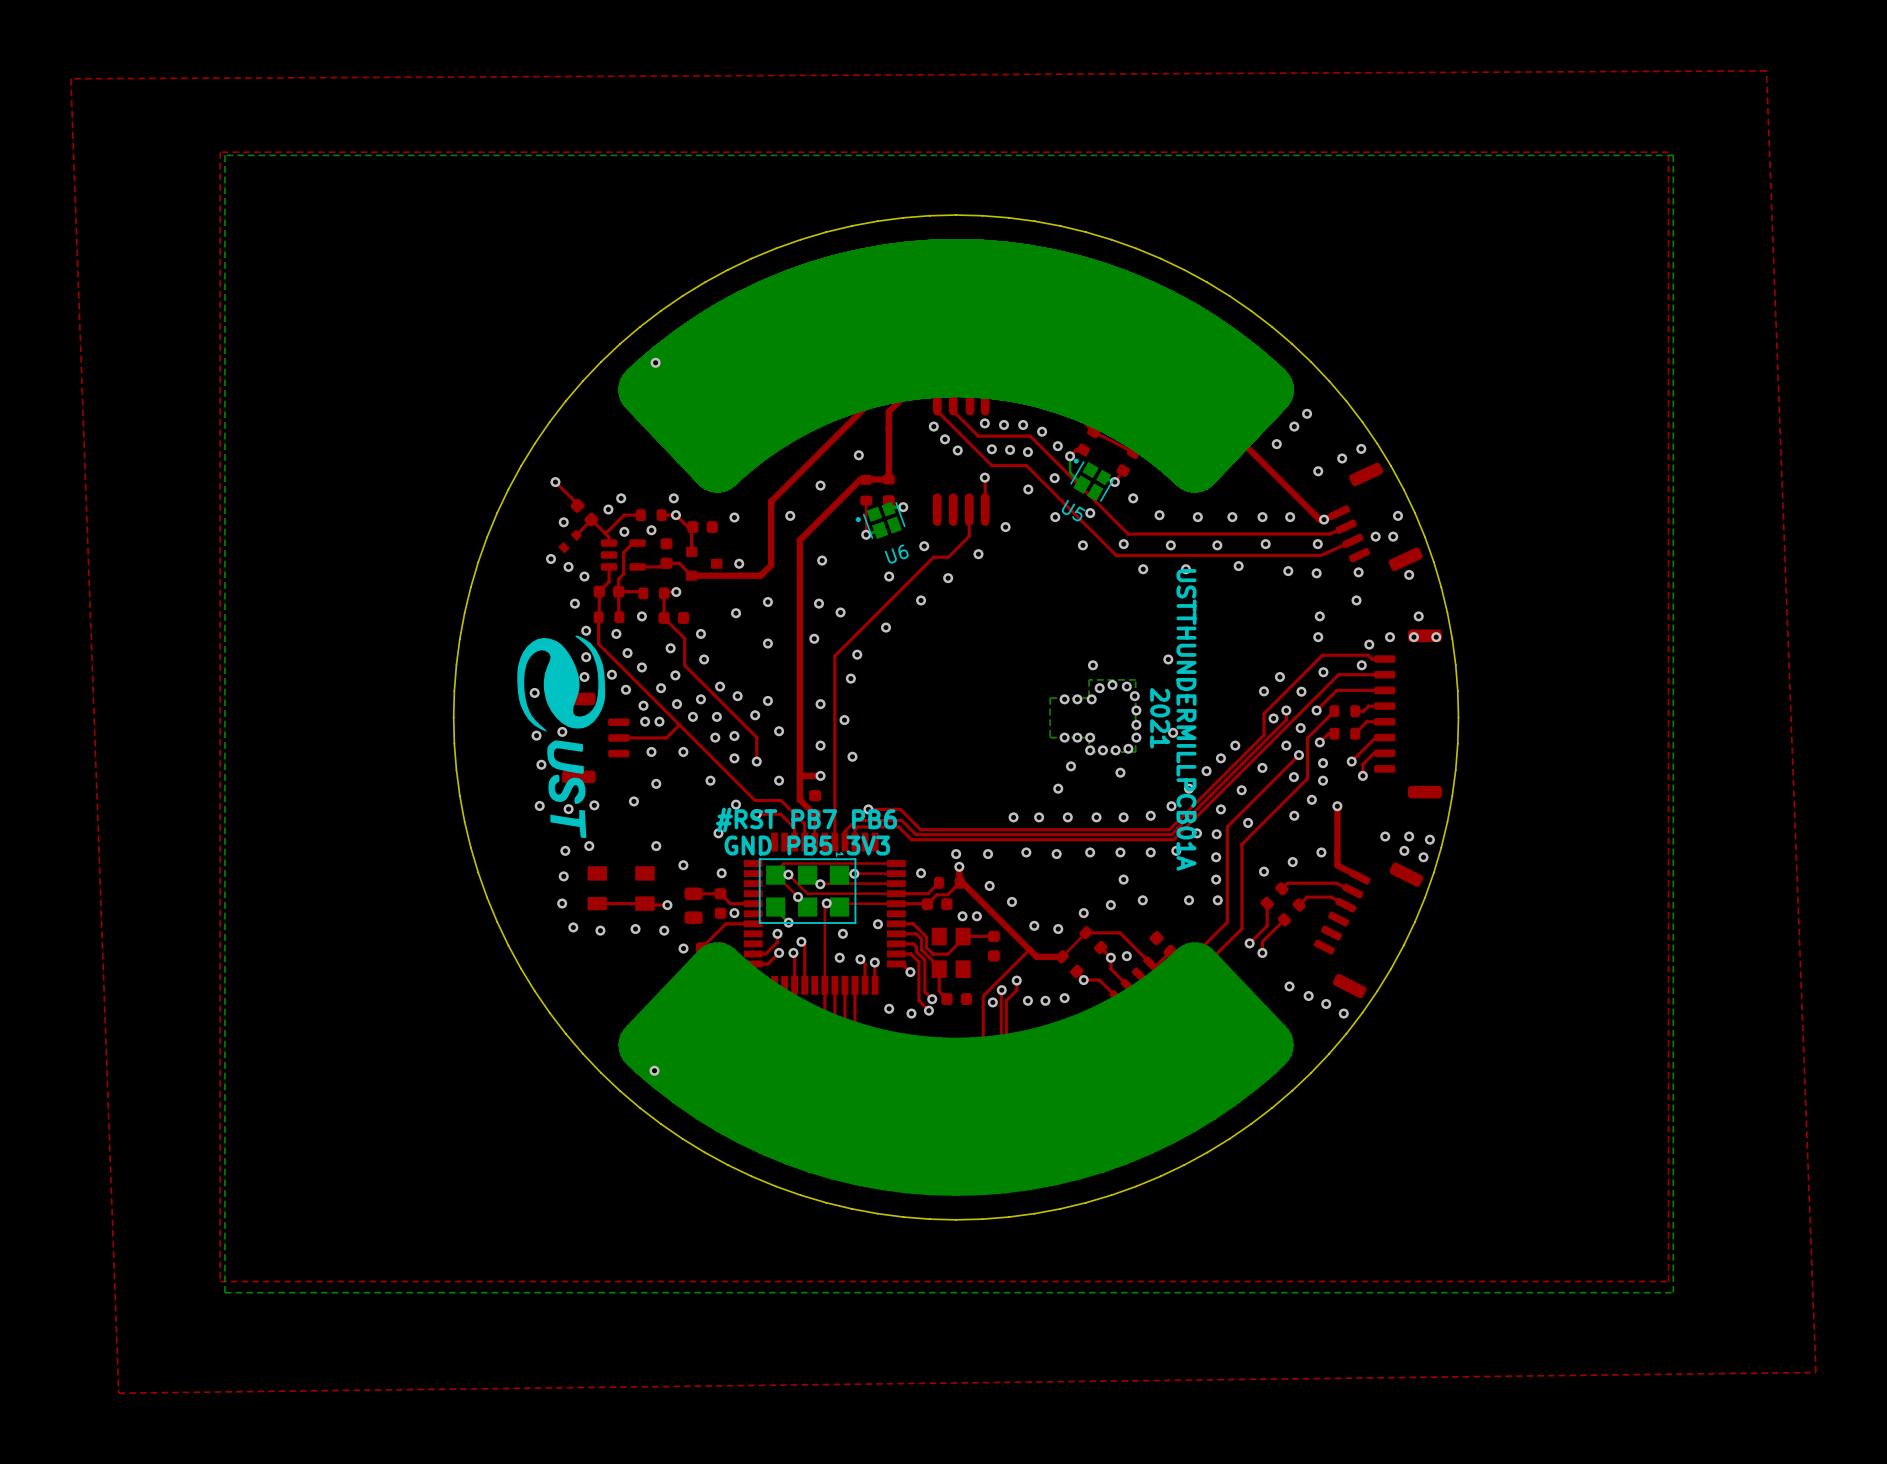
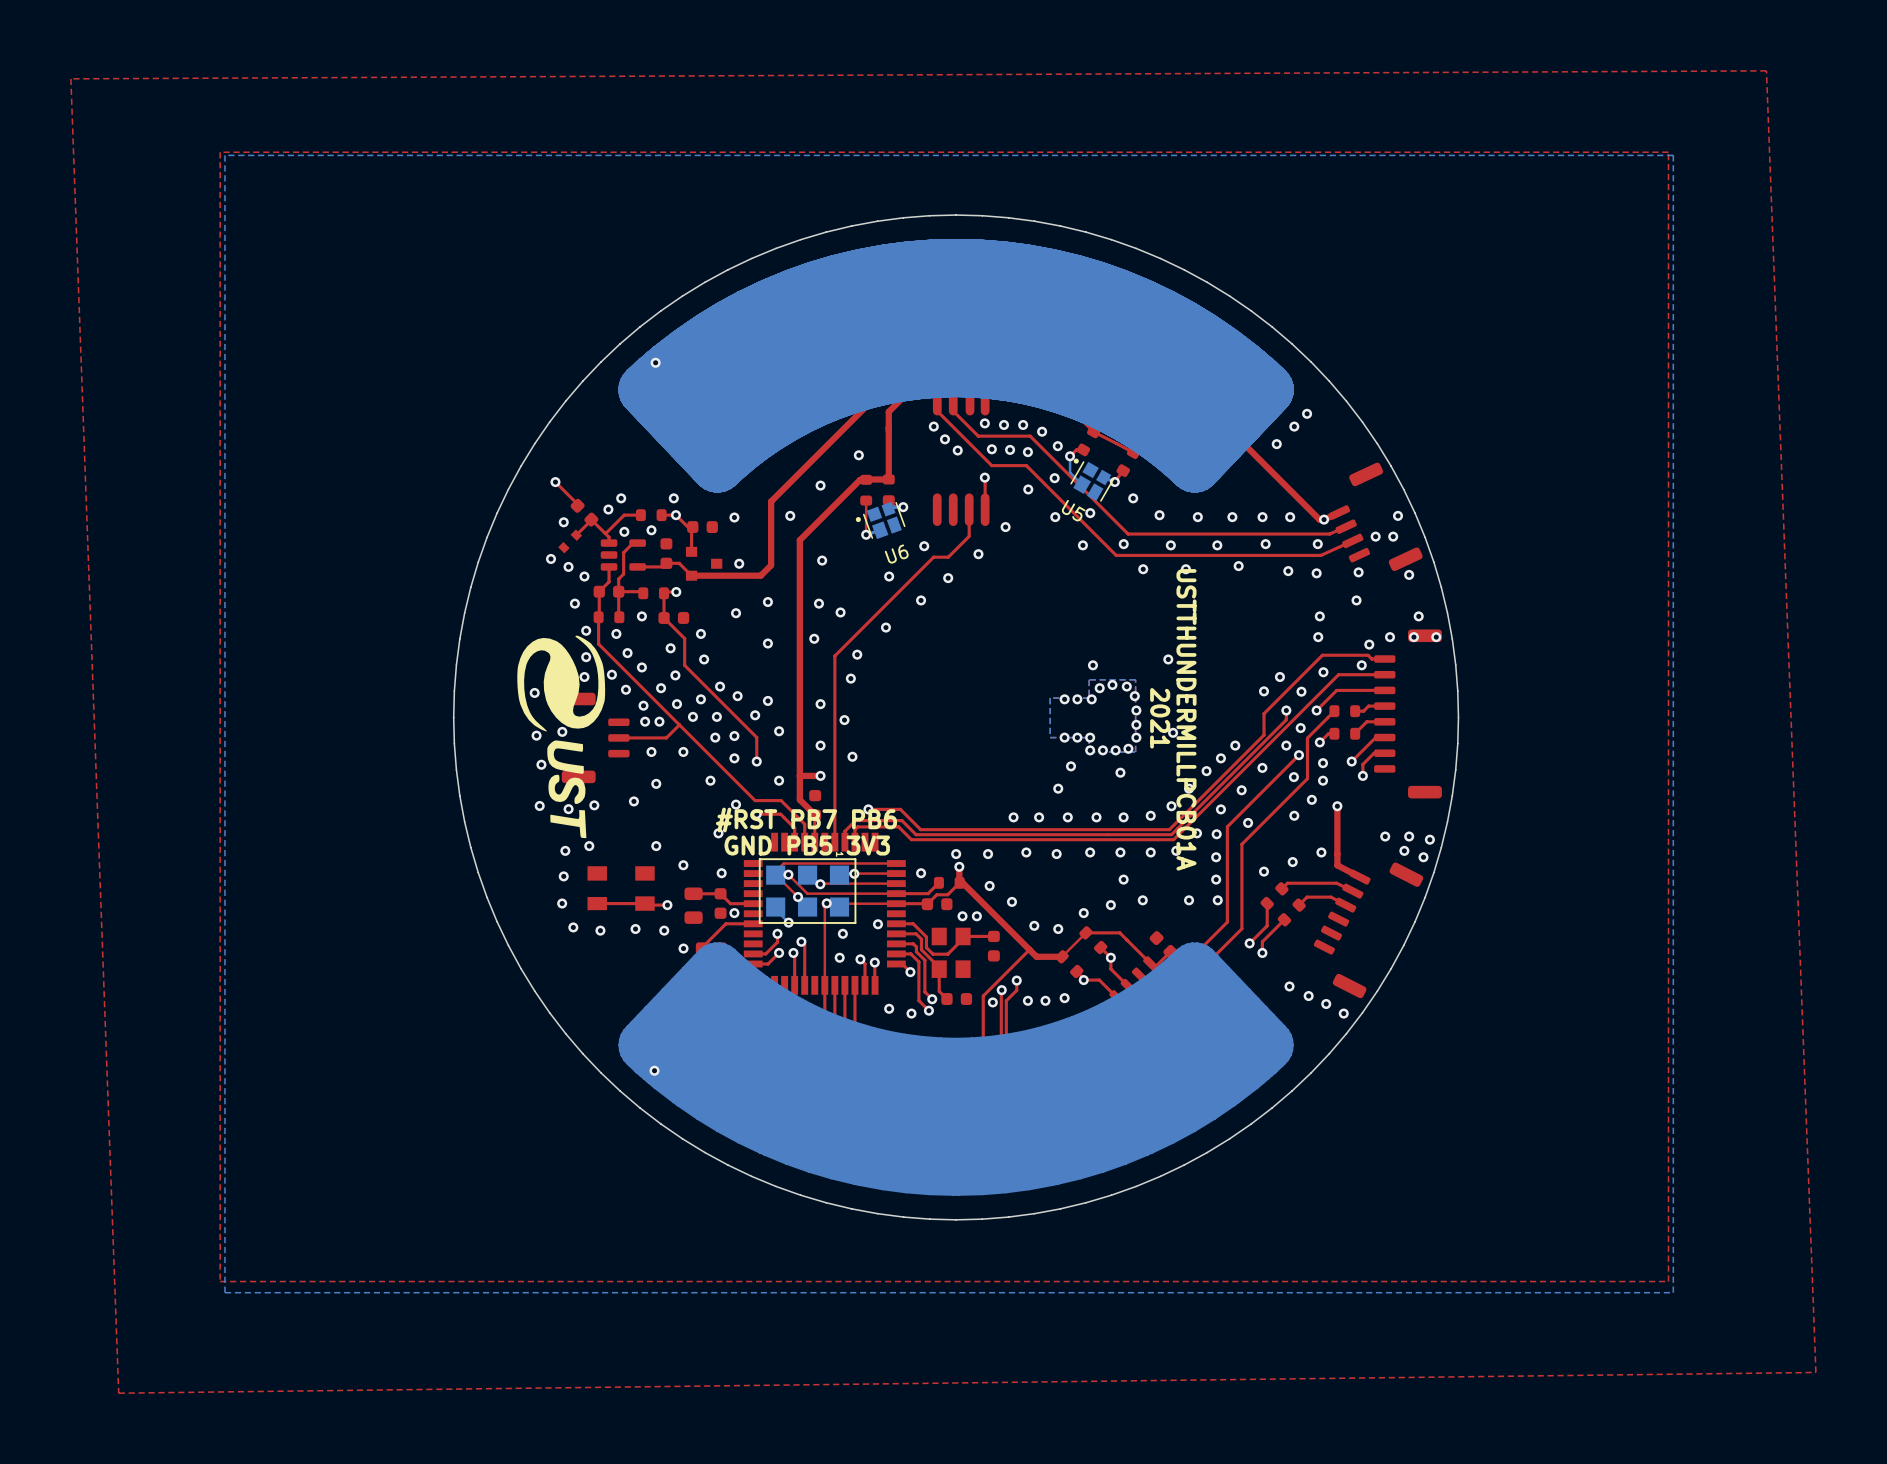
via: (1361, 448) -> none
via: (1342, 458) -> none
via: (1318, 471) -> none
via: (1273, 718) -> none
via: (1126, 956) -> none

